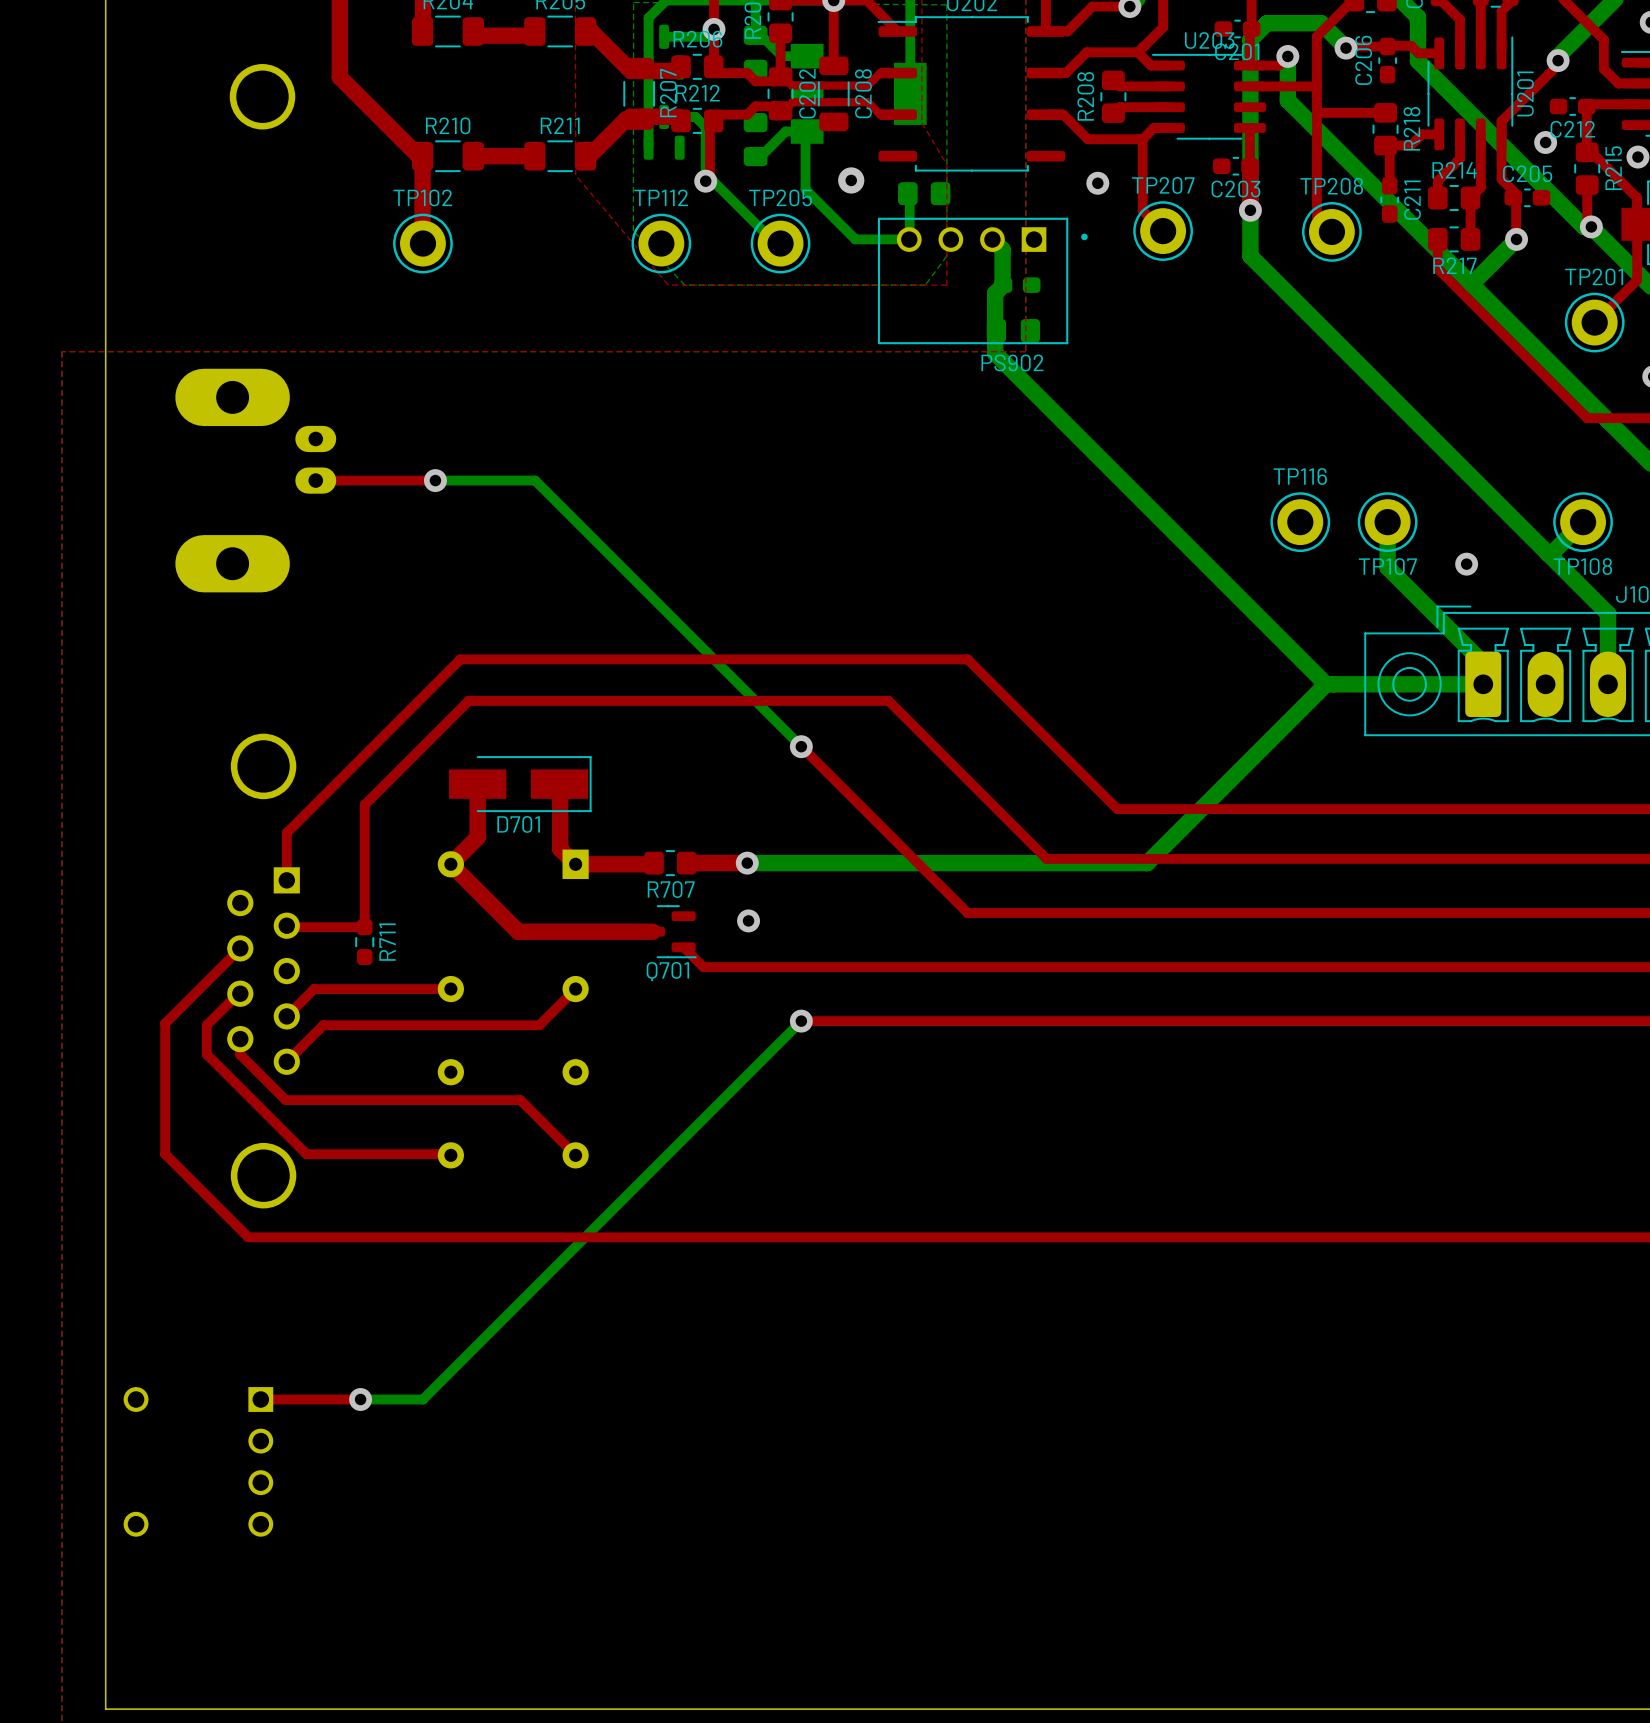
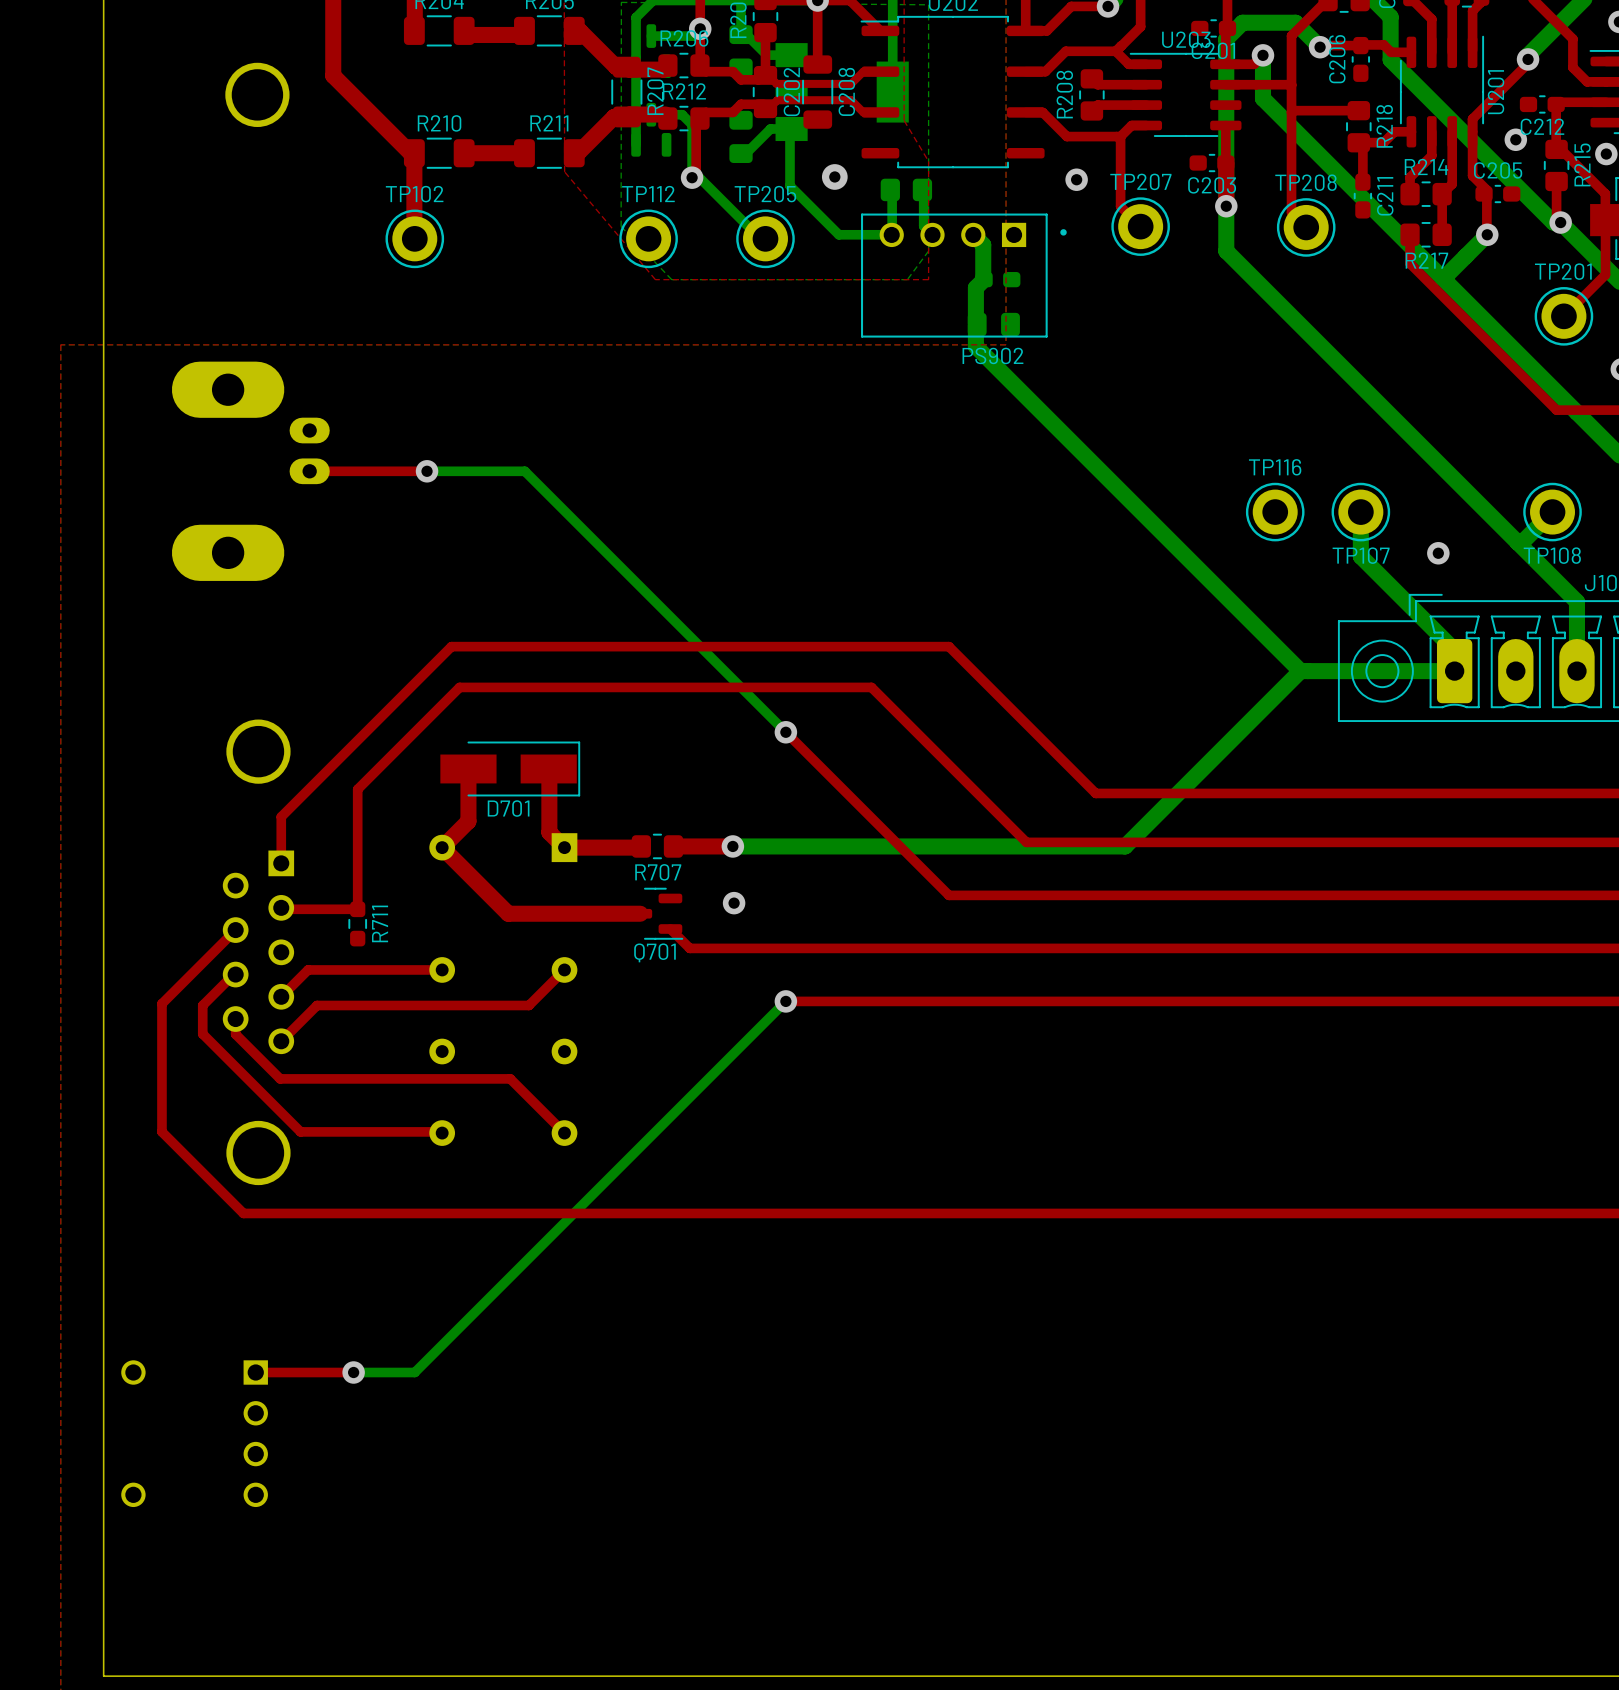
bottom track: none -> (922, 189) (923, 226) (932, 234)

